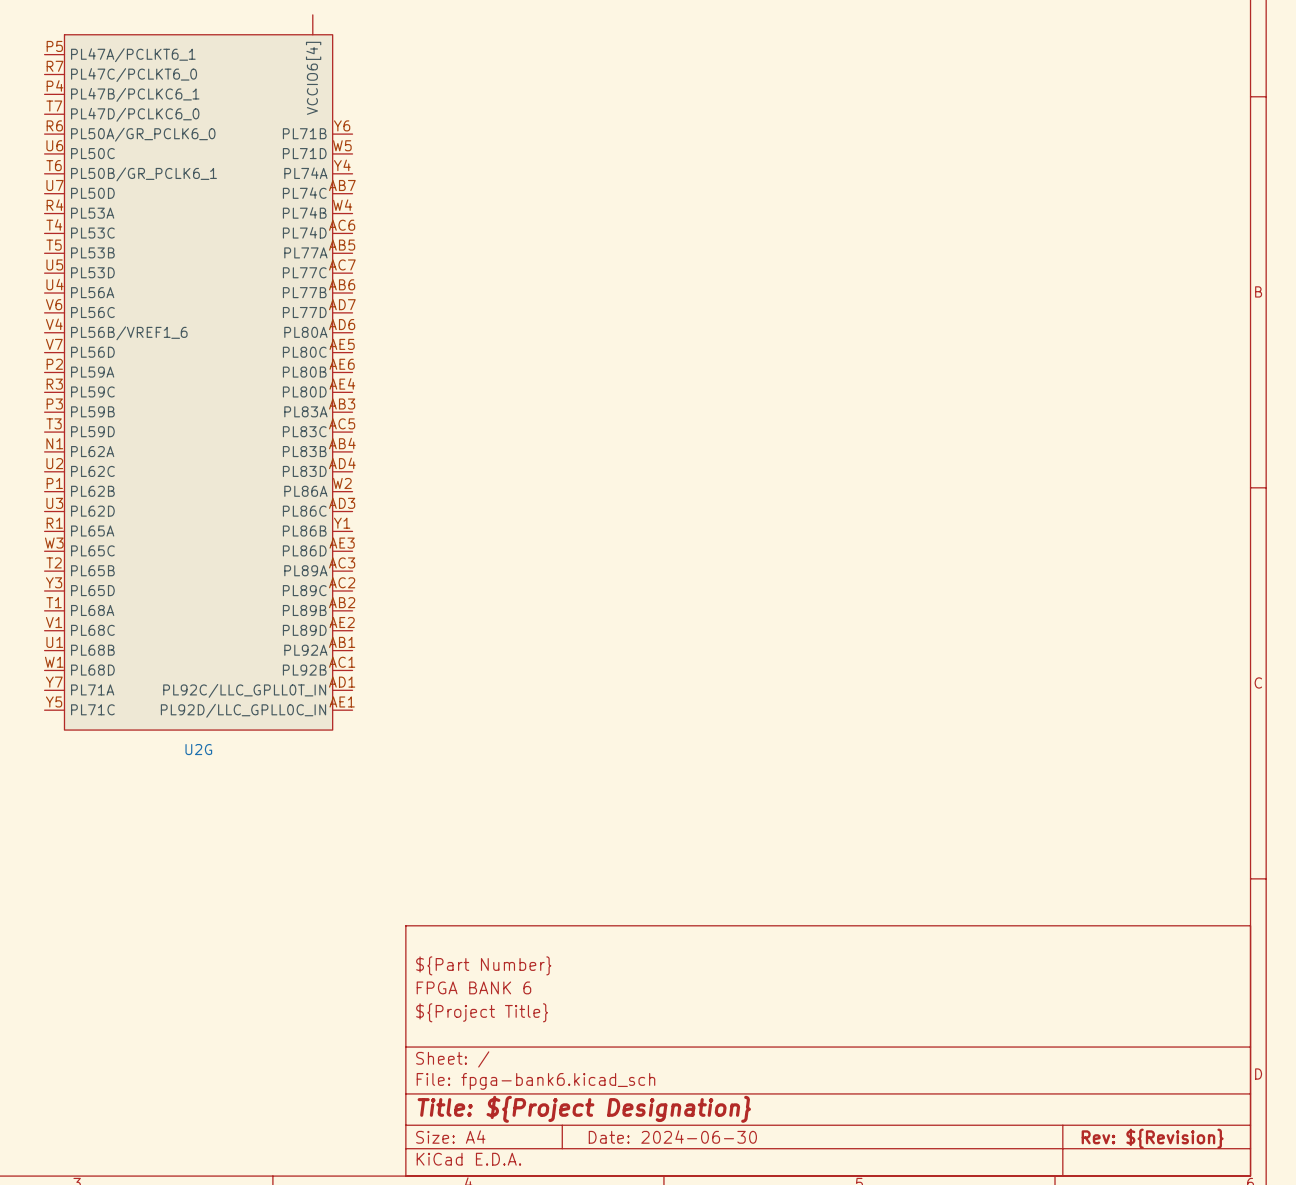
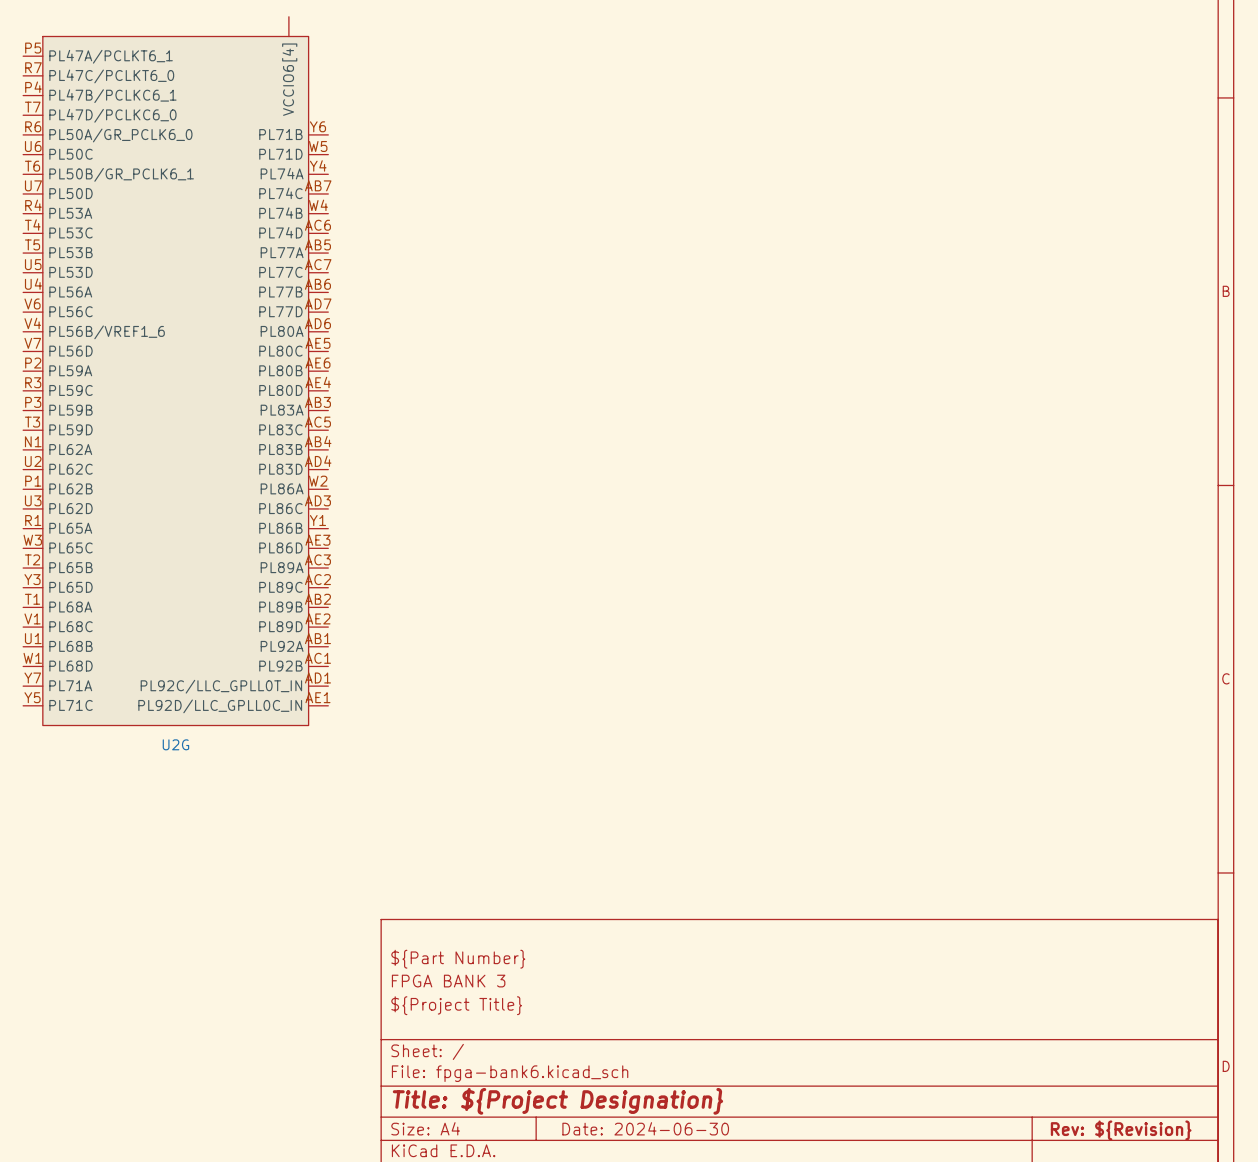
title block: FPGA BANK 6 (473, 987) -> FPGA BANK 3 (448, 981)

